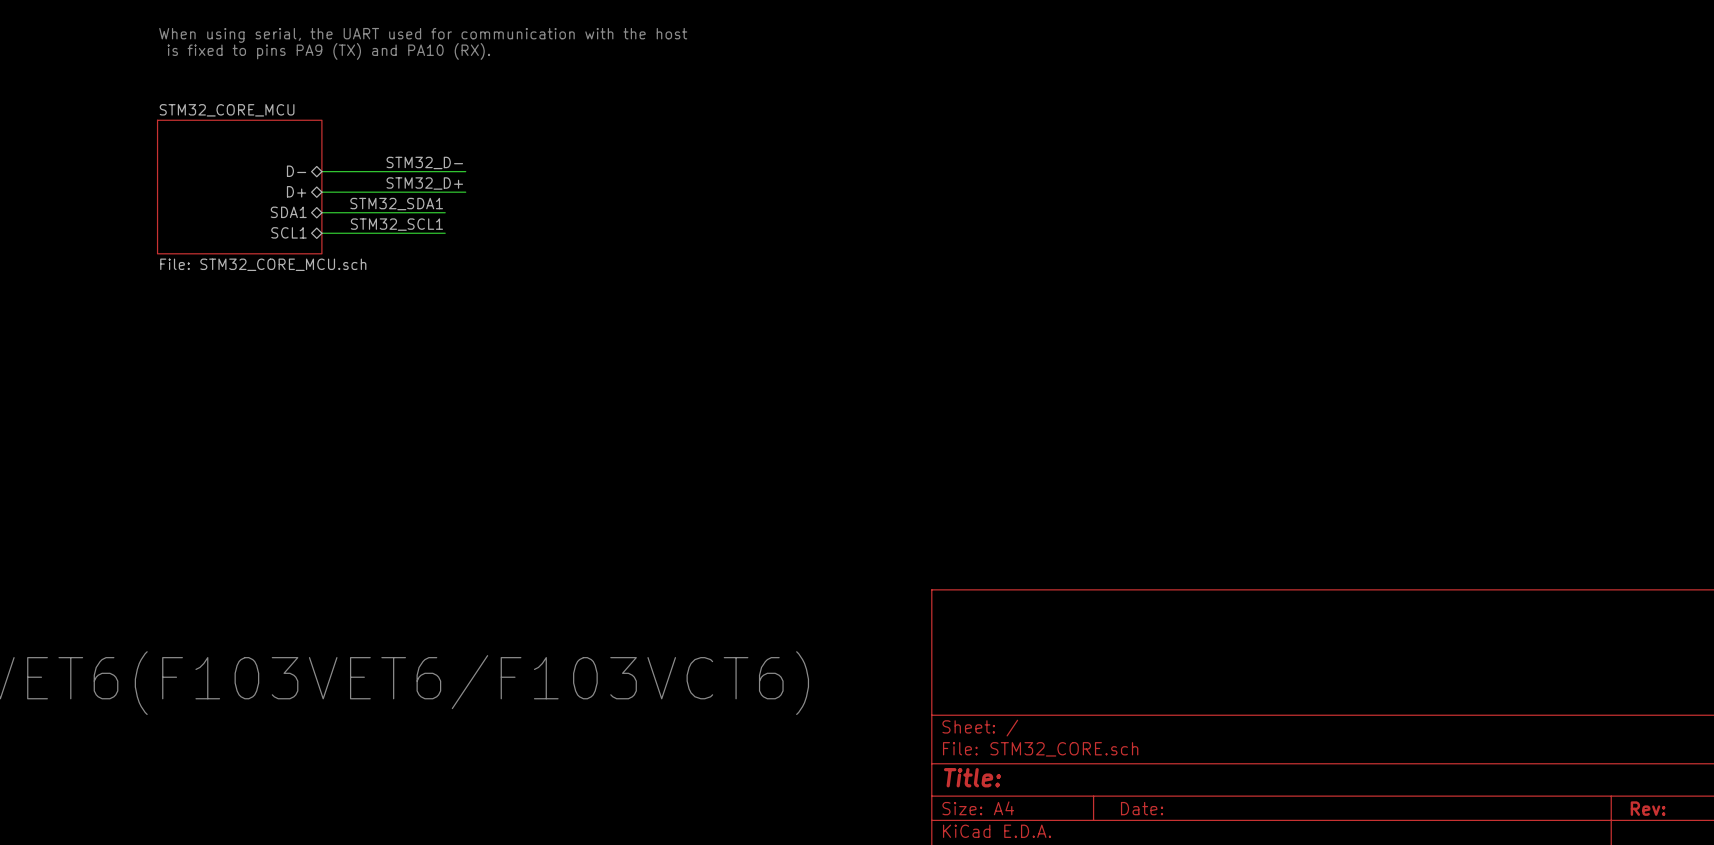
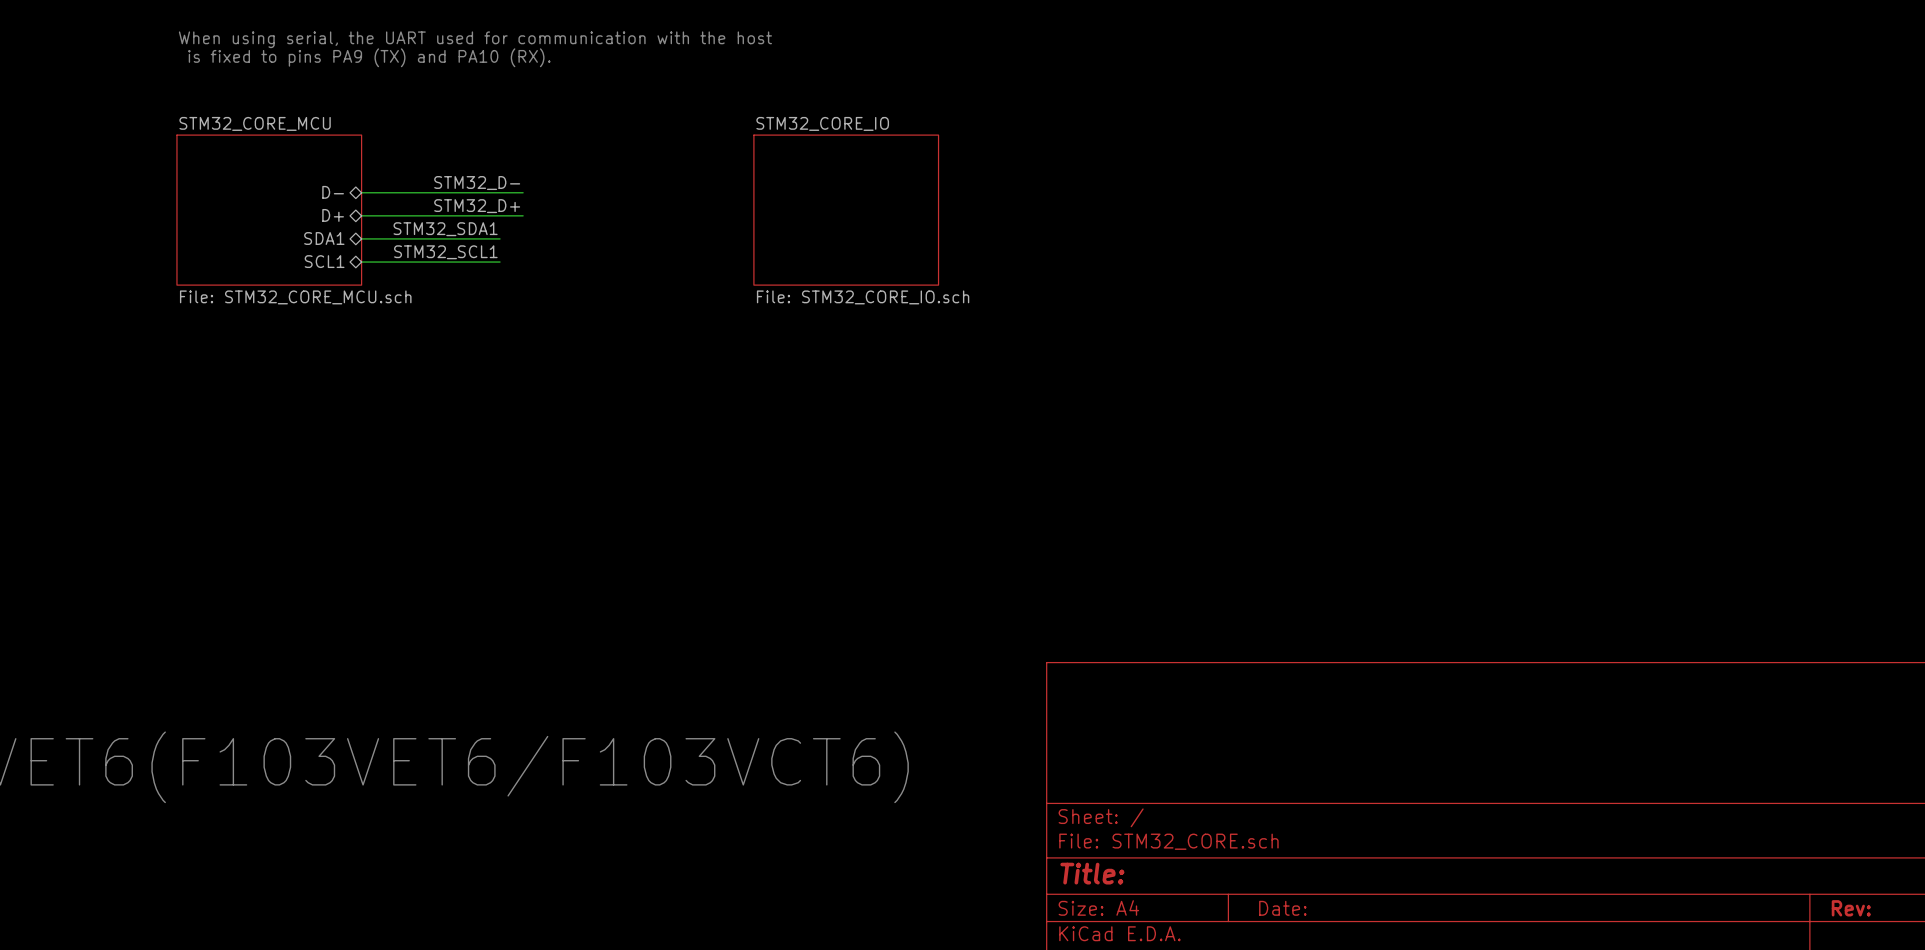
sheet STM32_CORE_IO: none -> File: STM32_CORE_IO.sch (846, 210)

